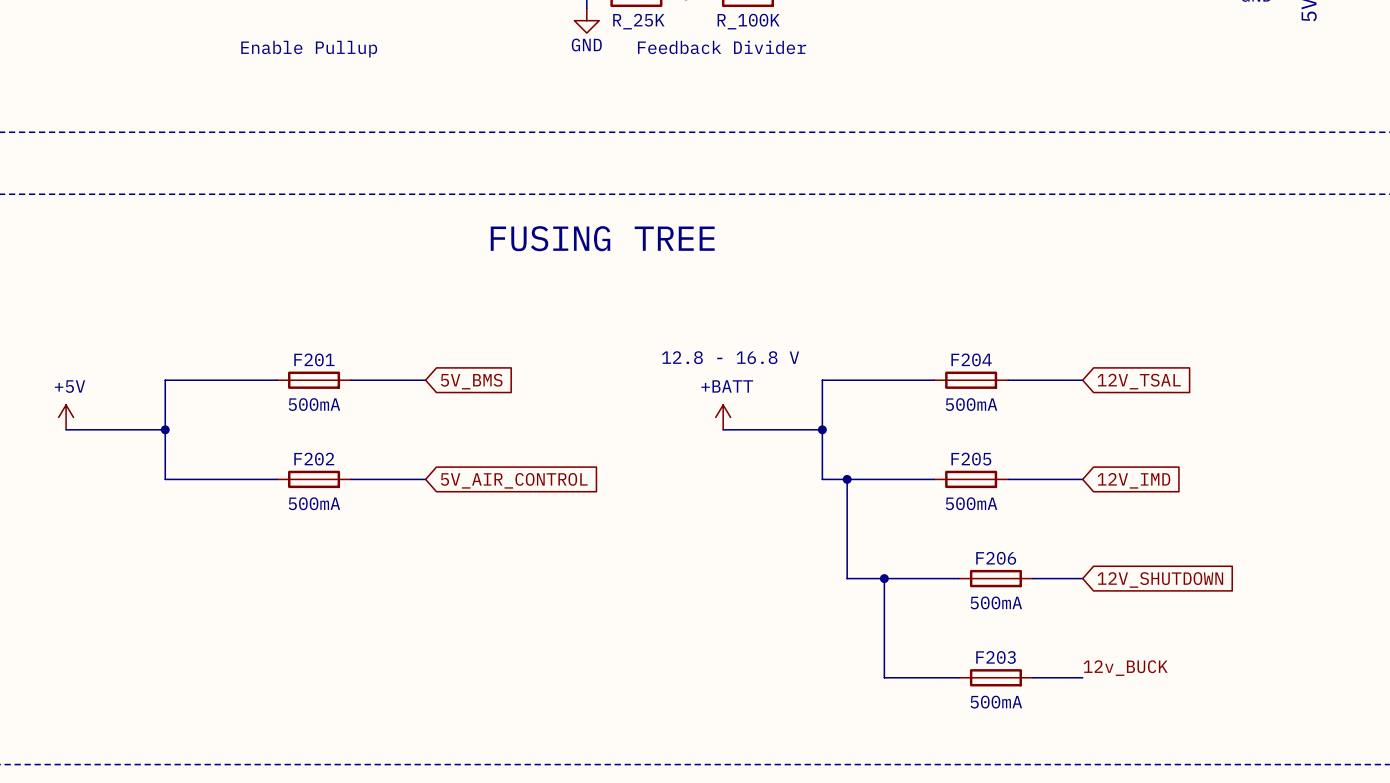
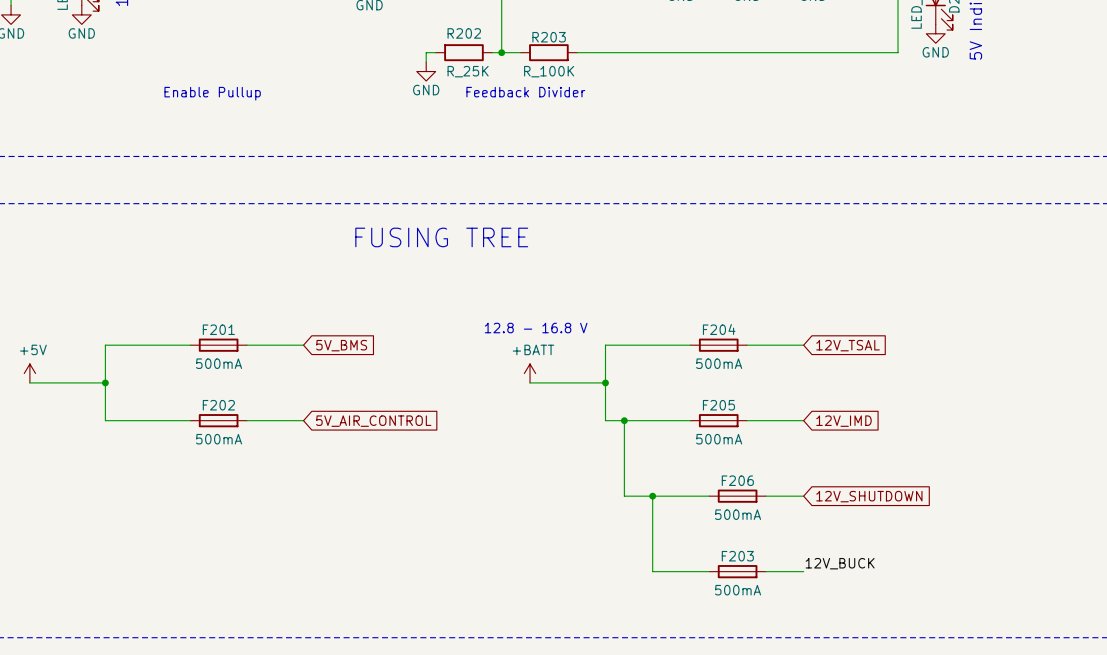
label: 12v_BUCK (1125, 668) -> 12V_BUCK (840, 563)

